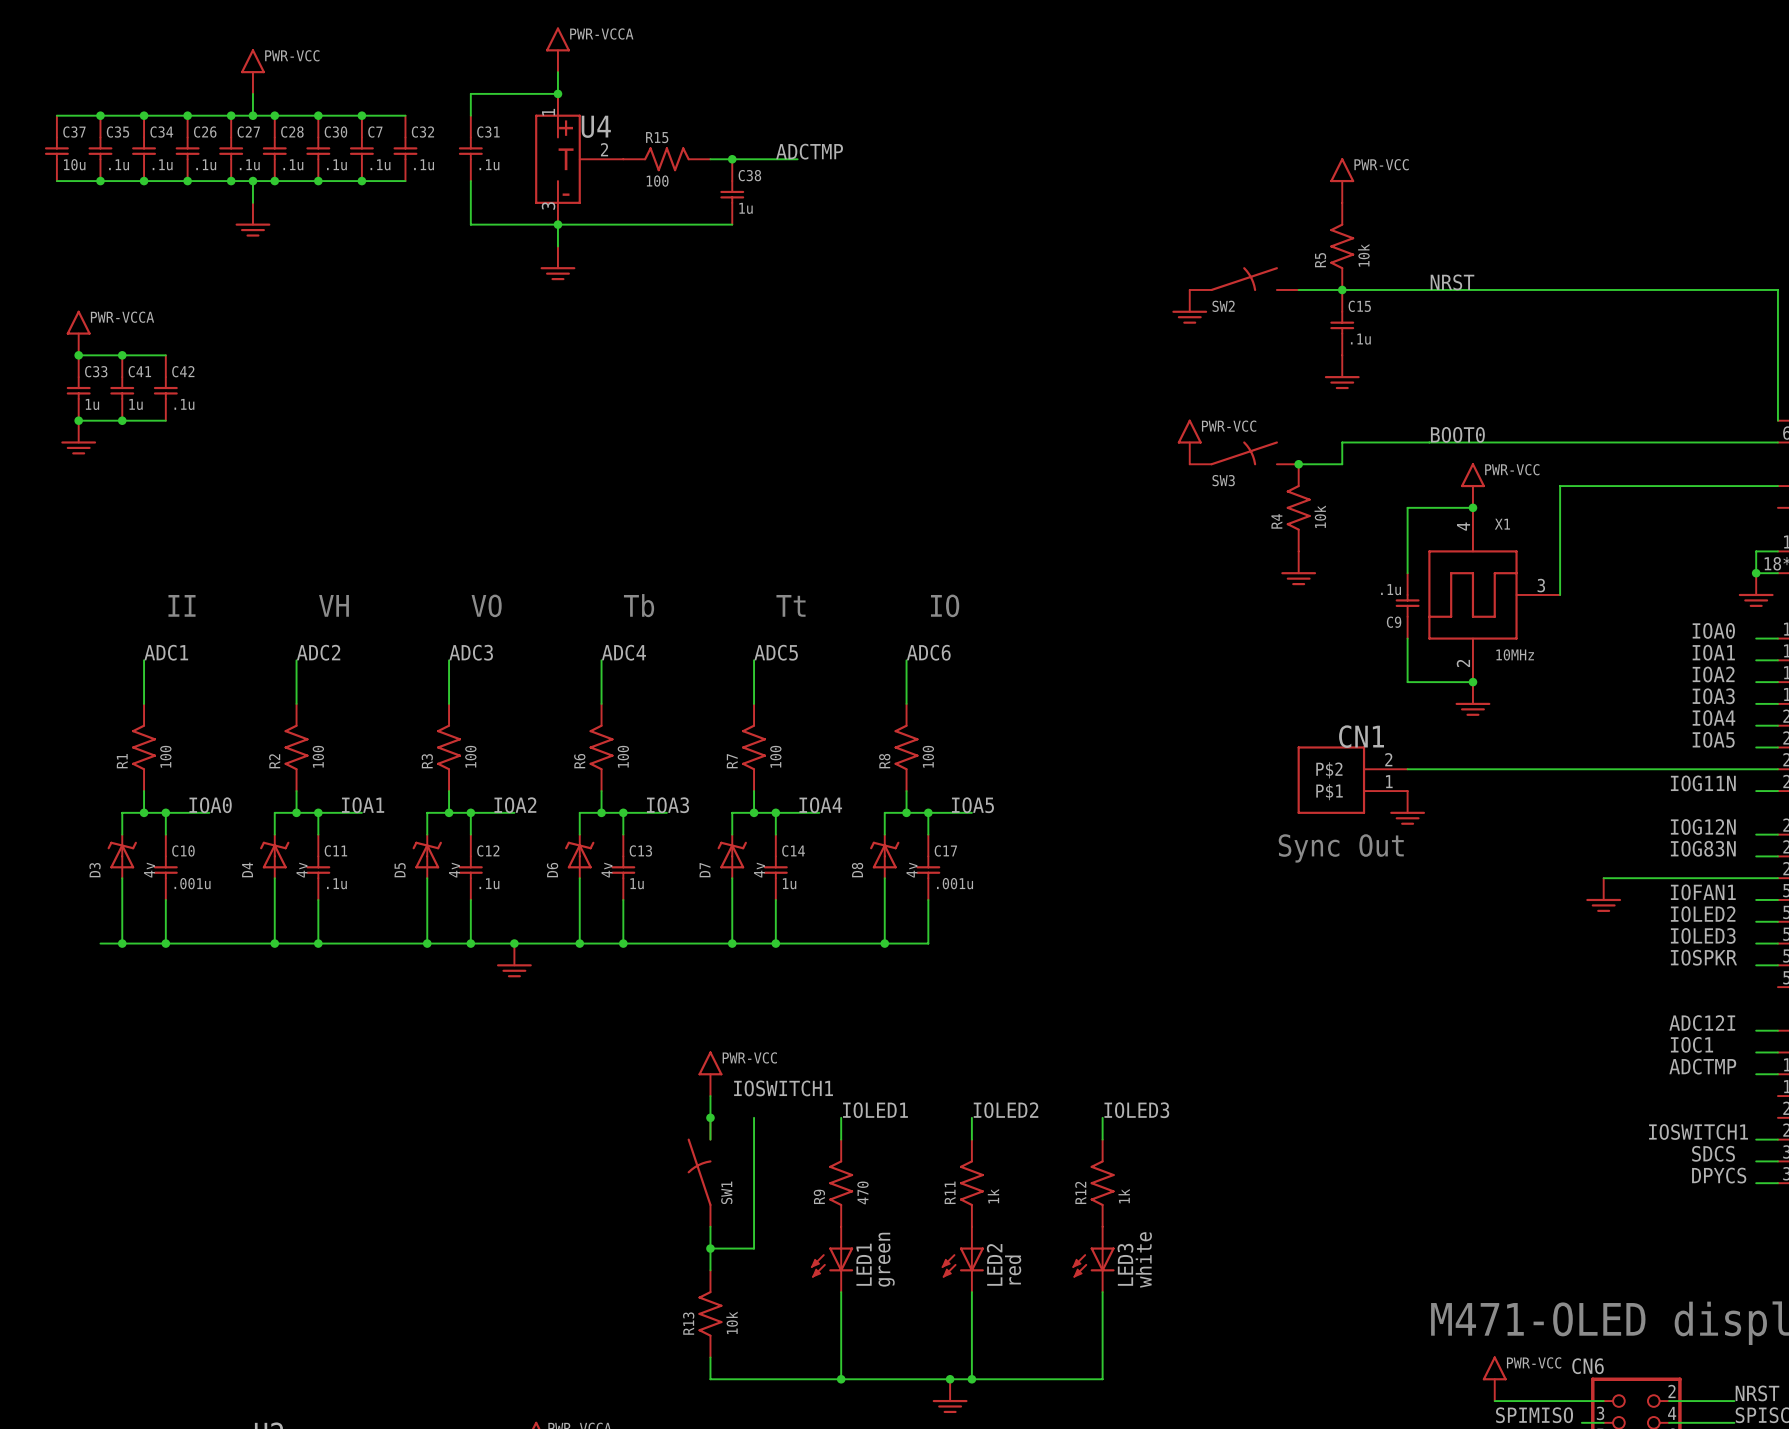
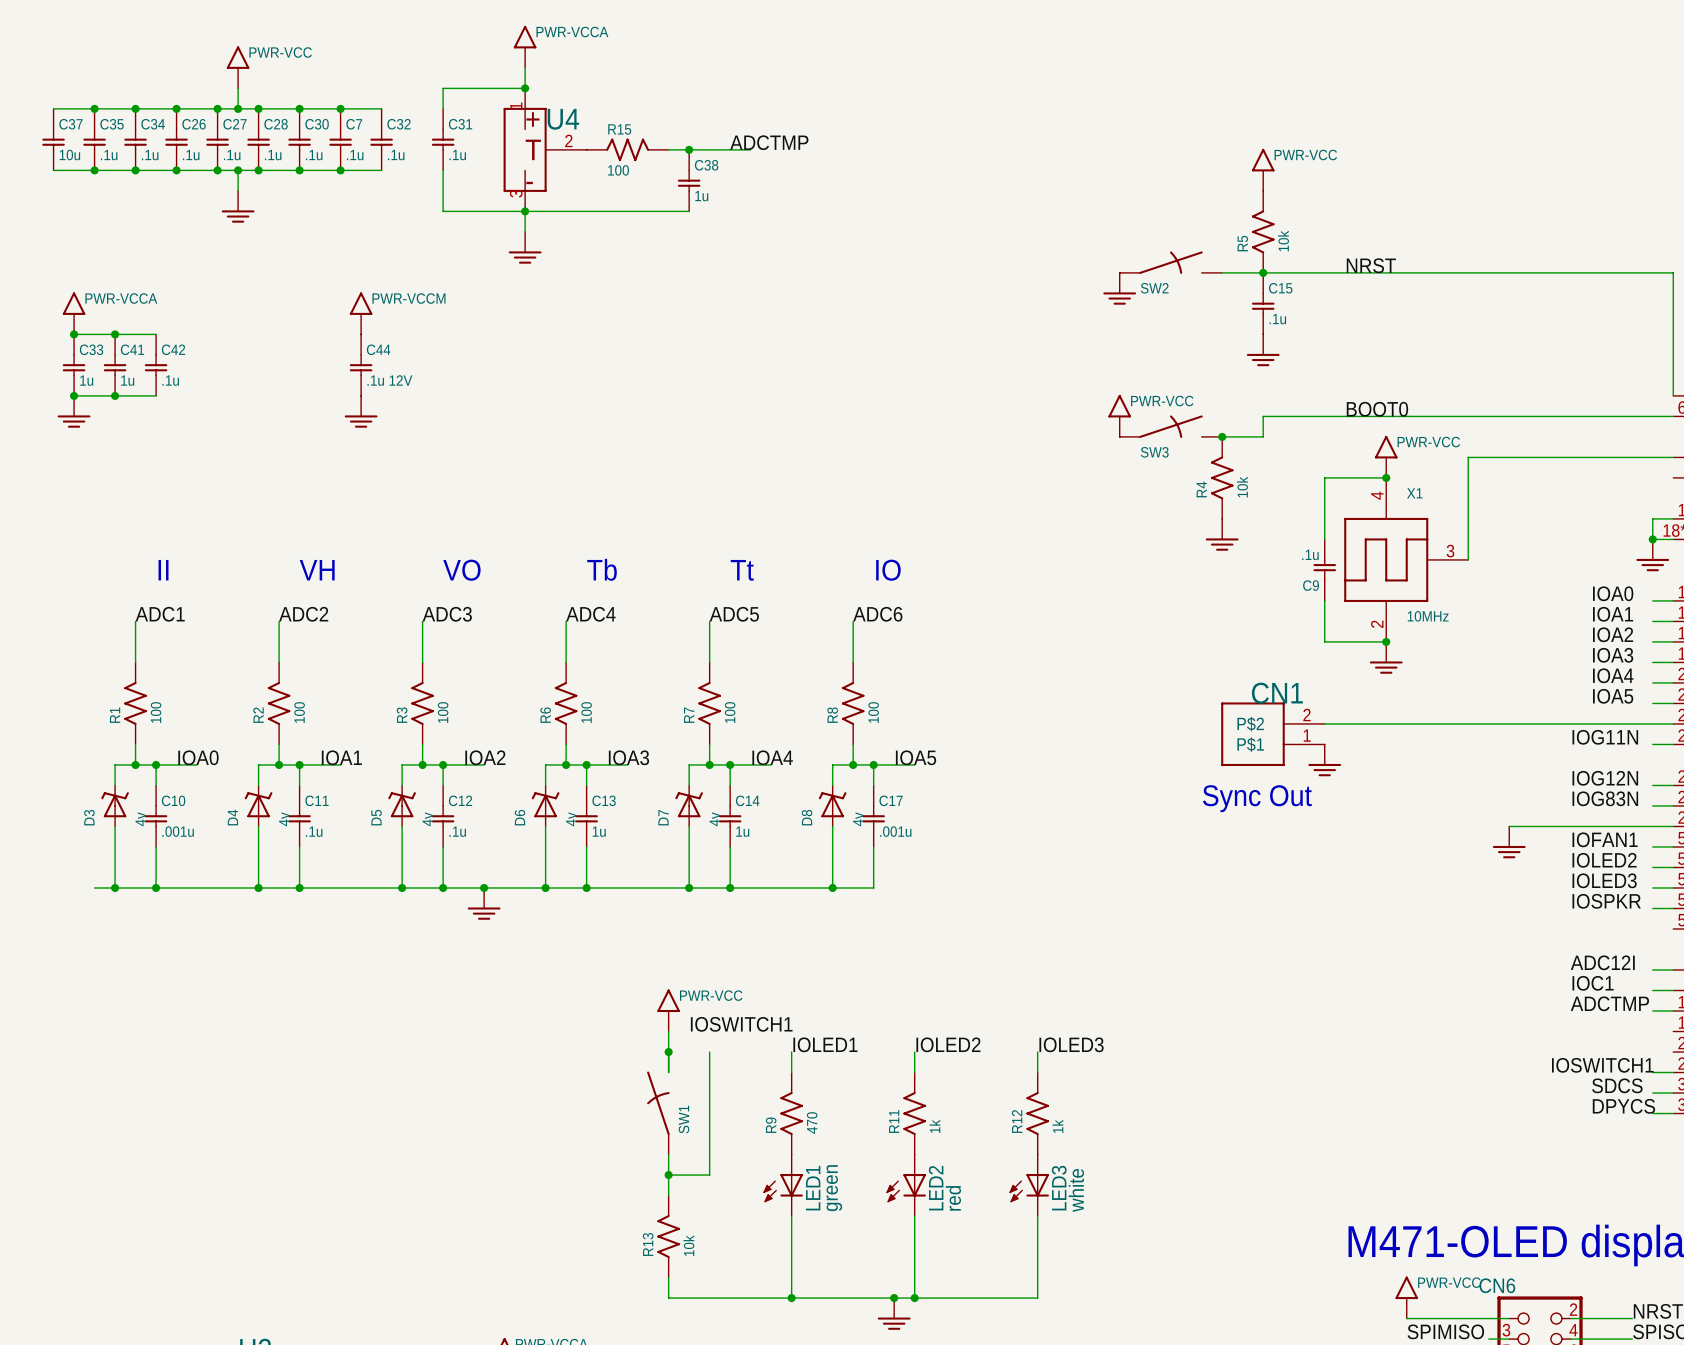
power symbol: none -> PWR-VCCM (361, 313)
C44: none -> .1u 12V (361, 365)
power symbol: none -> (361, 411)

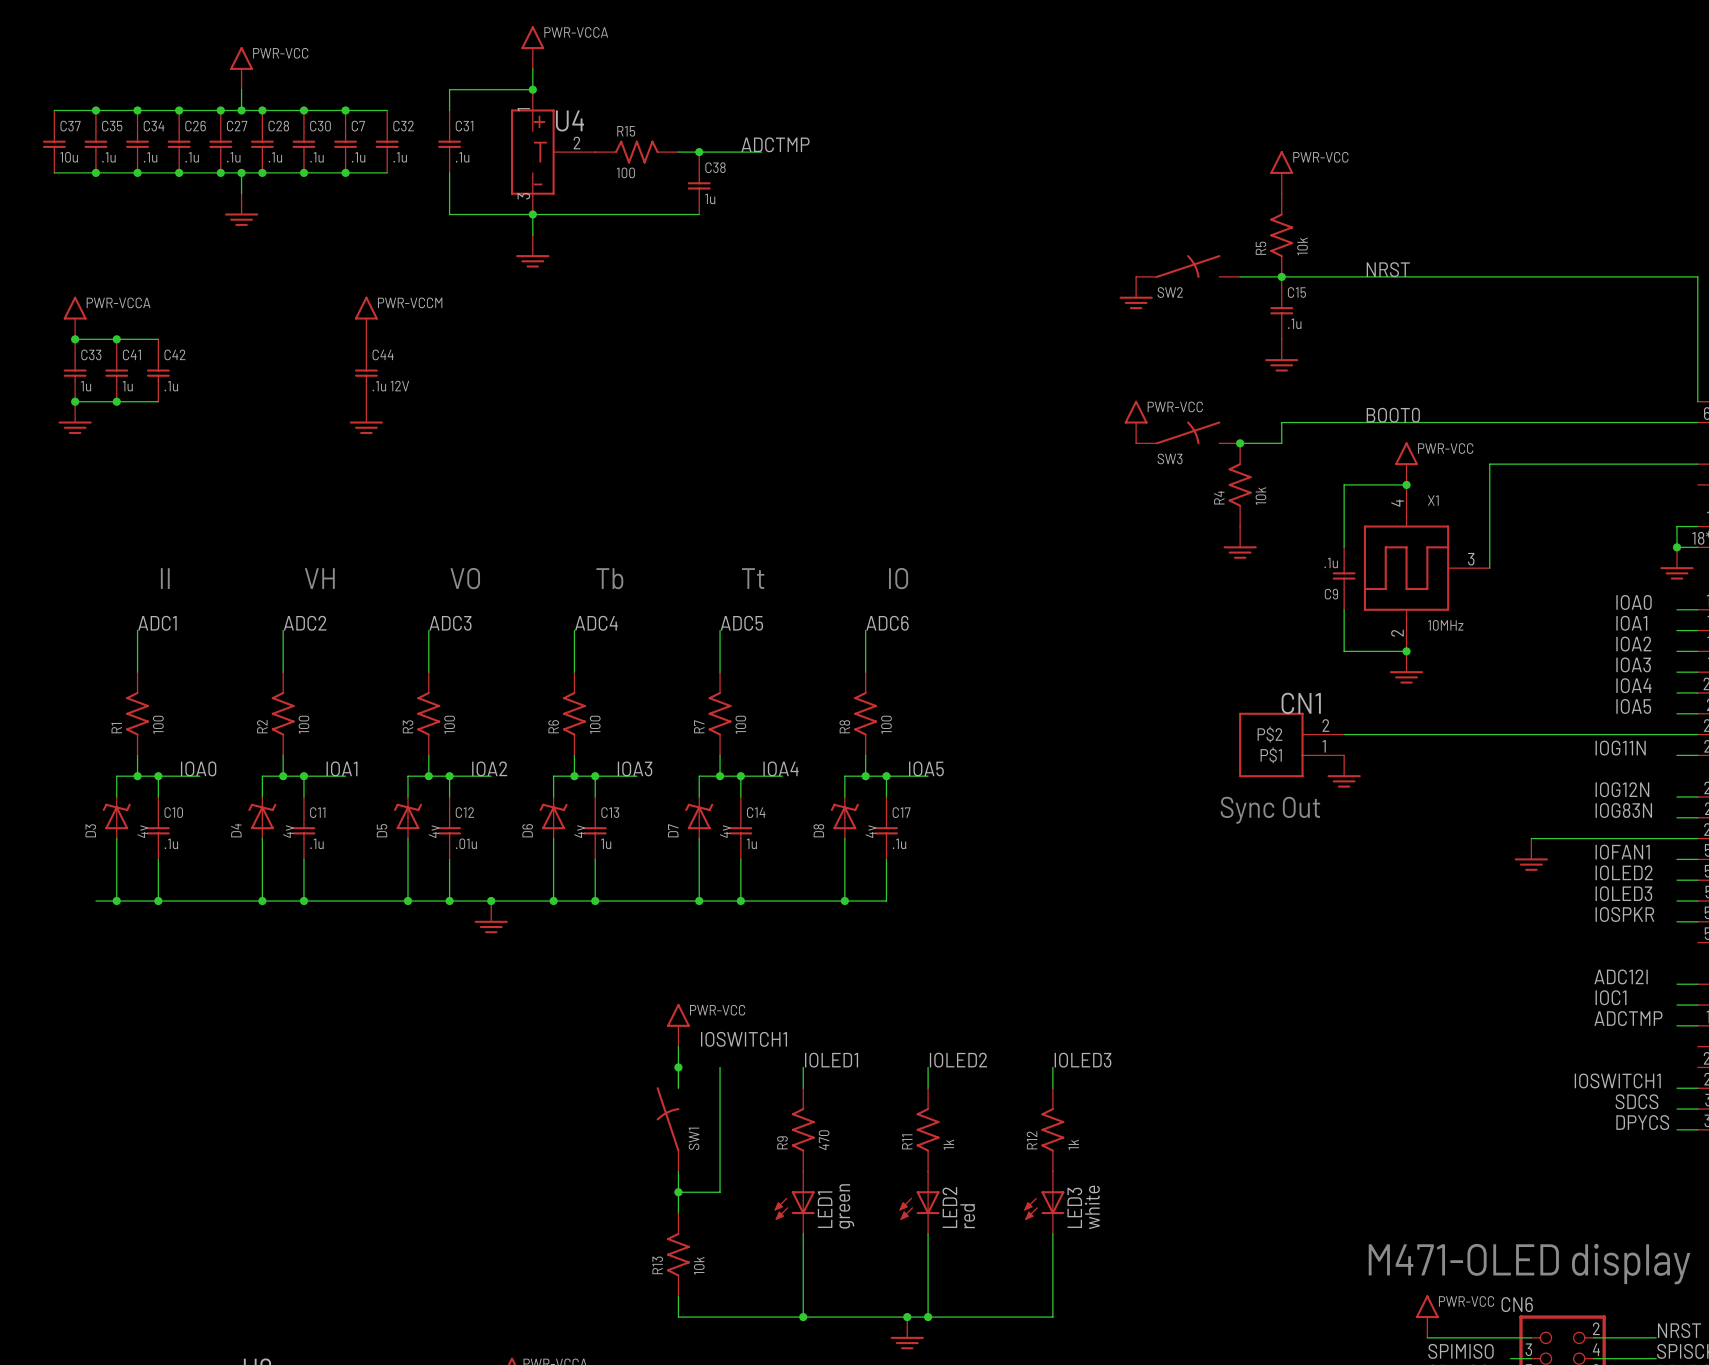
C10 value: .001u (178, 831) -> .1u (171, 843)
C12 value: .1u (457, 831) -> .01u (466, 843)
C17 value: .001u (895, 831) -> .1u (899, 843)

